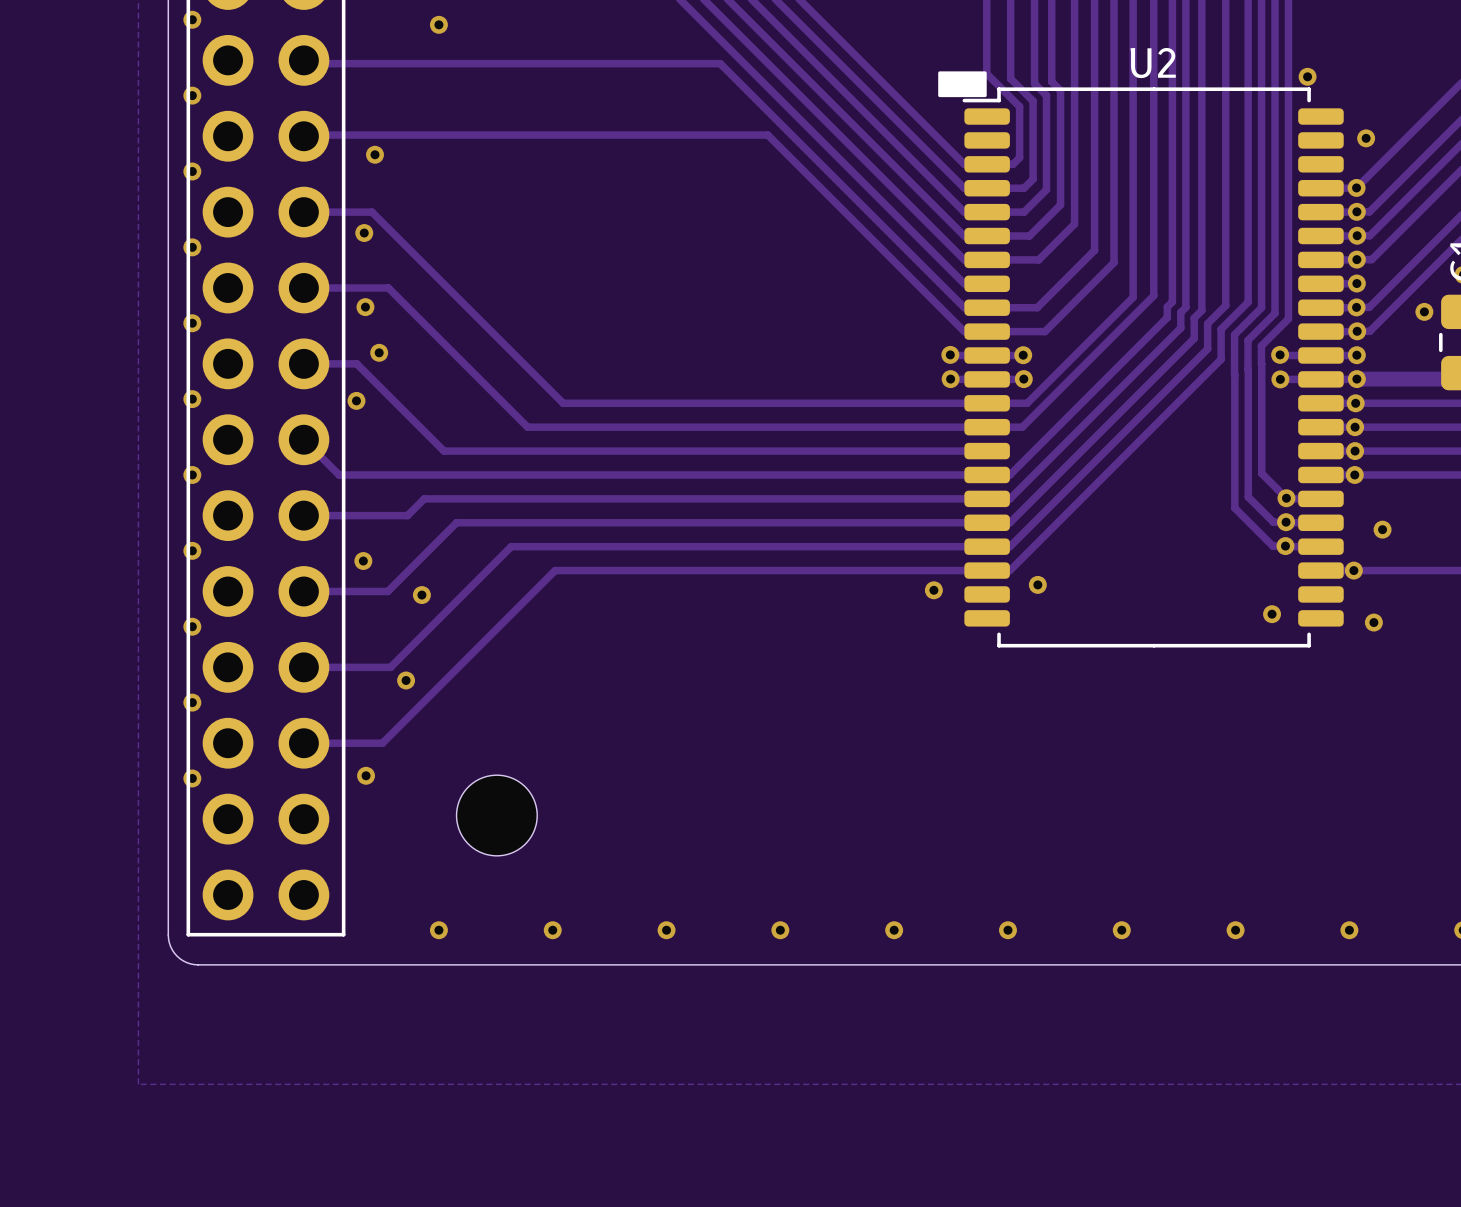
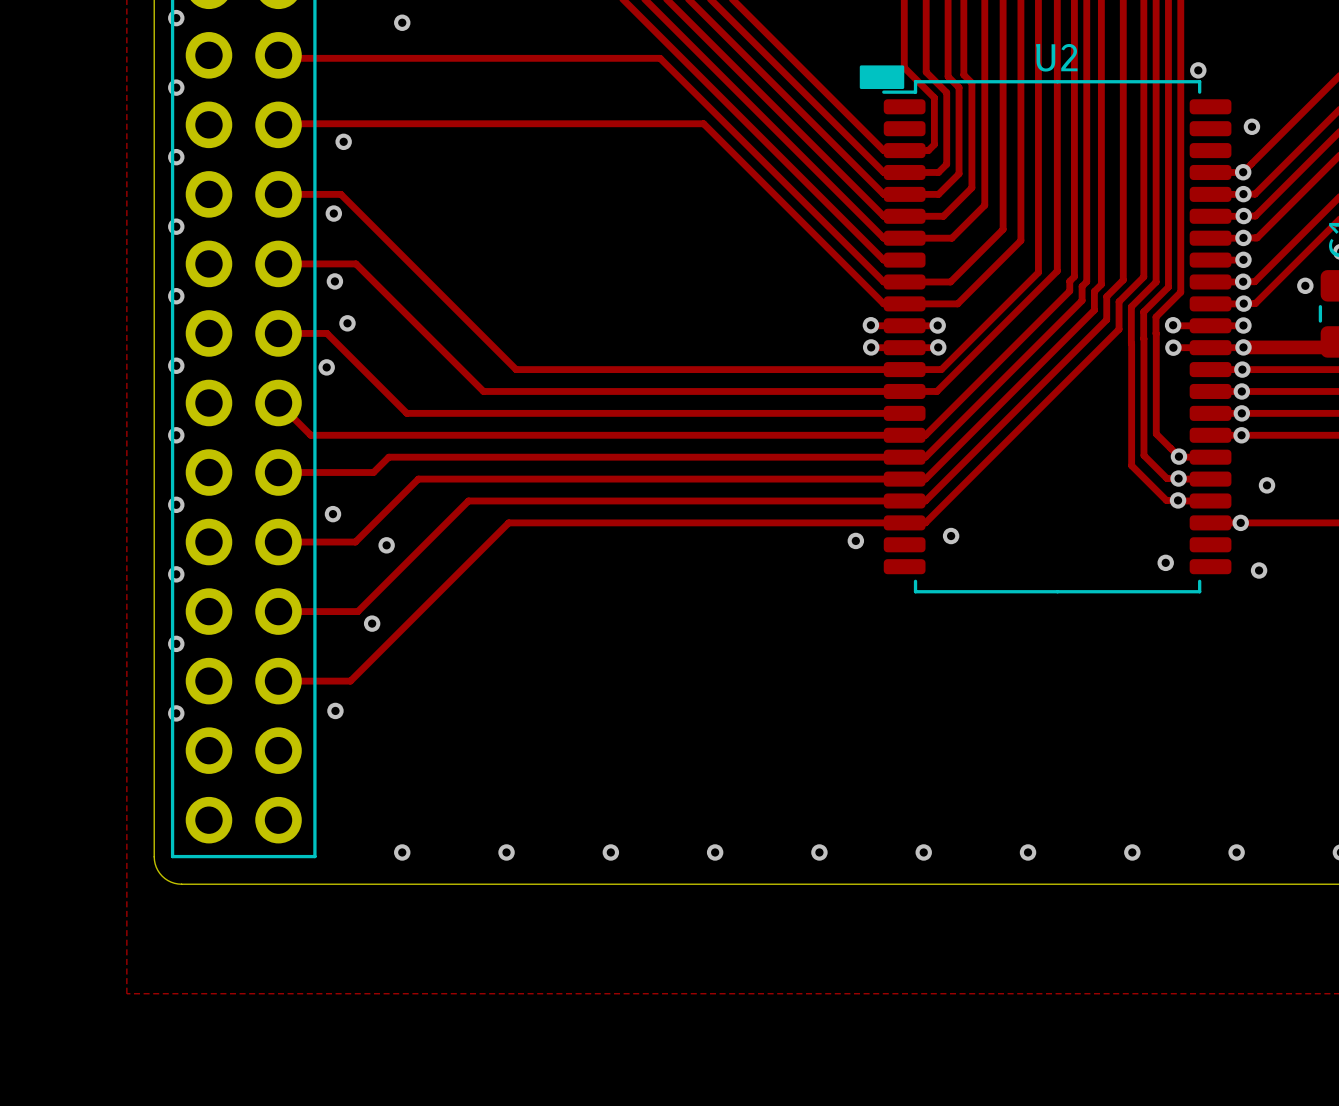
part: (496, 815) -> none

